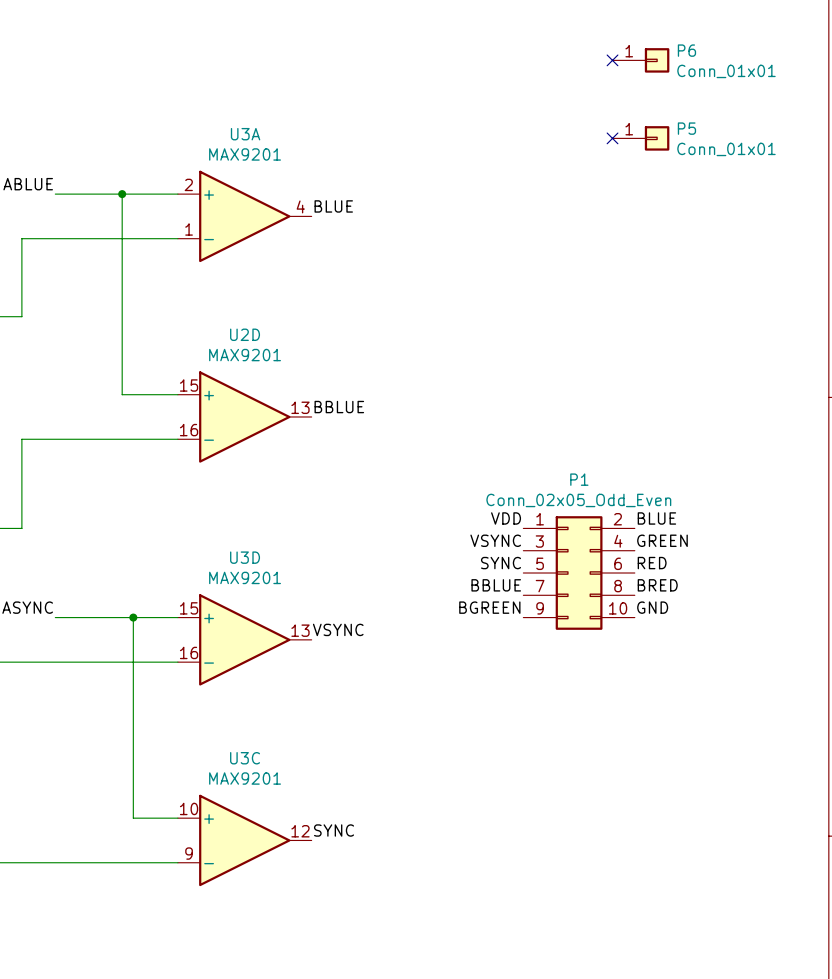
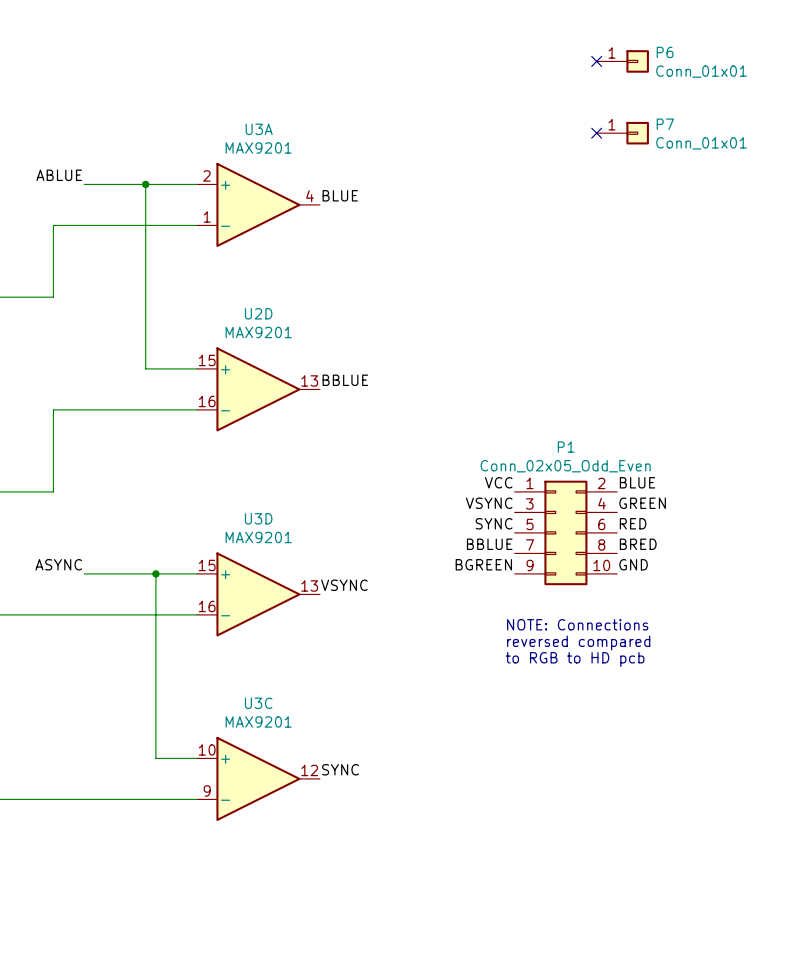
P5 name: P5 (686, 128) -> P7 (665, 124)
label: VDD (506, 518) -> VCC (498, 482)
text: none -> NOTE: Connections (577, 624)
text: none -> reversed compared (578, 642)
text: none -> to RGB to HD pcb (575, 659)

